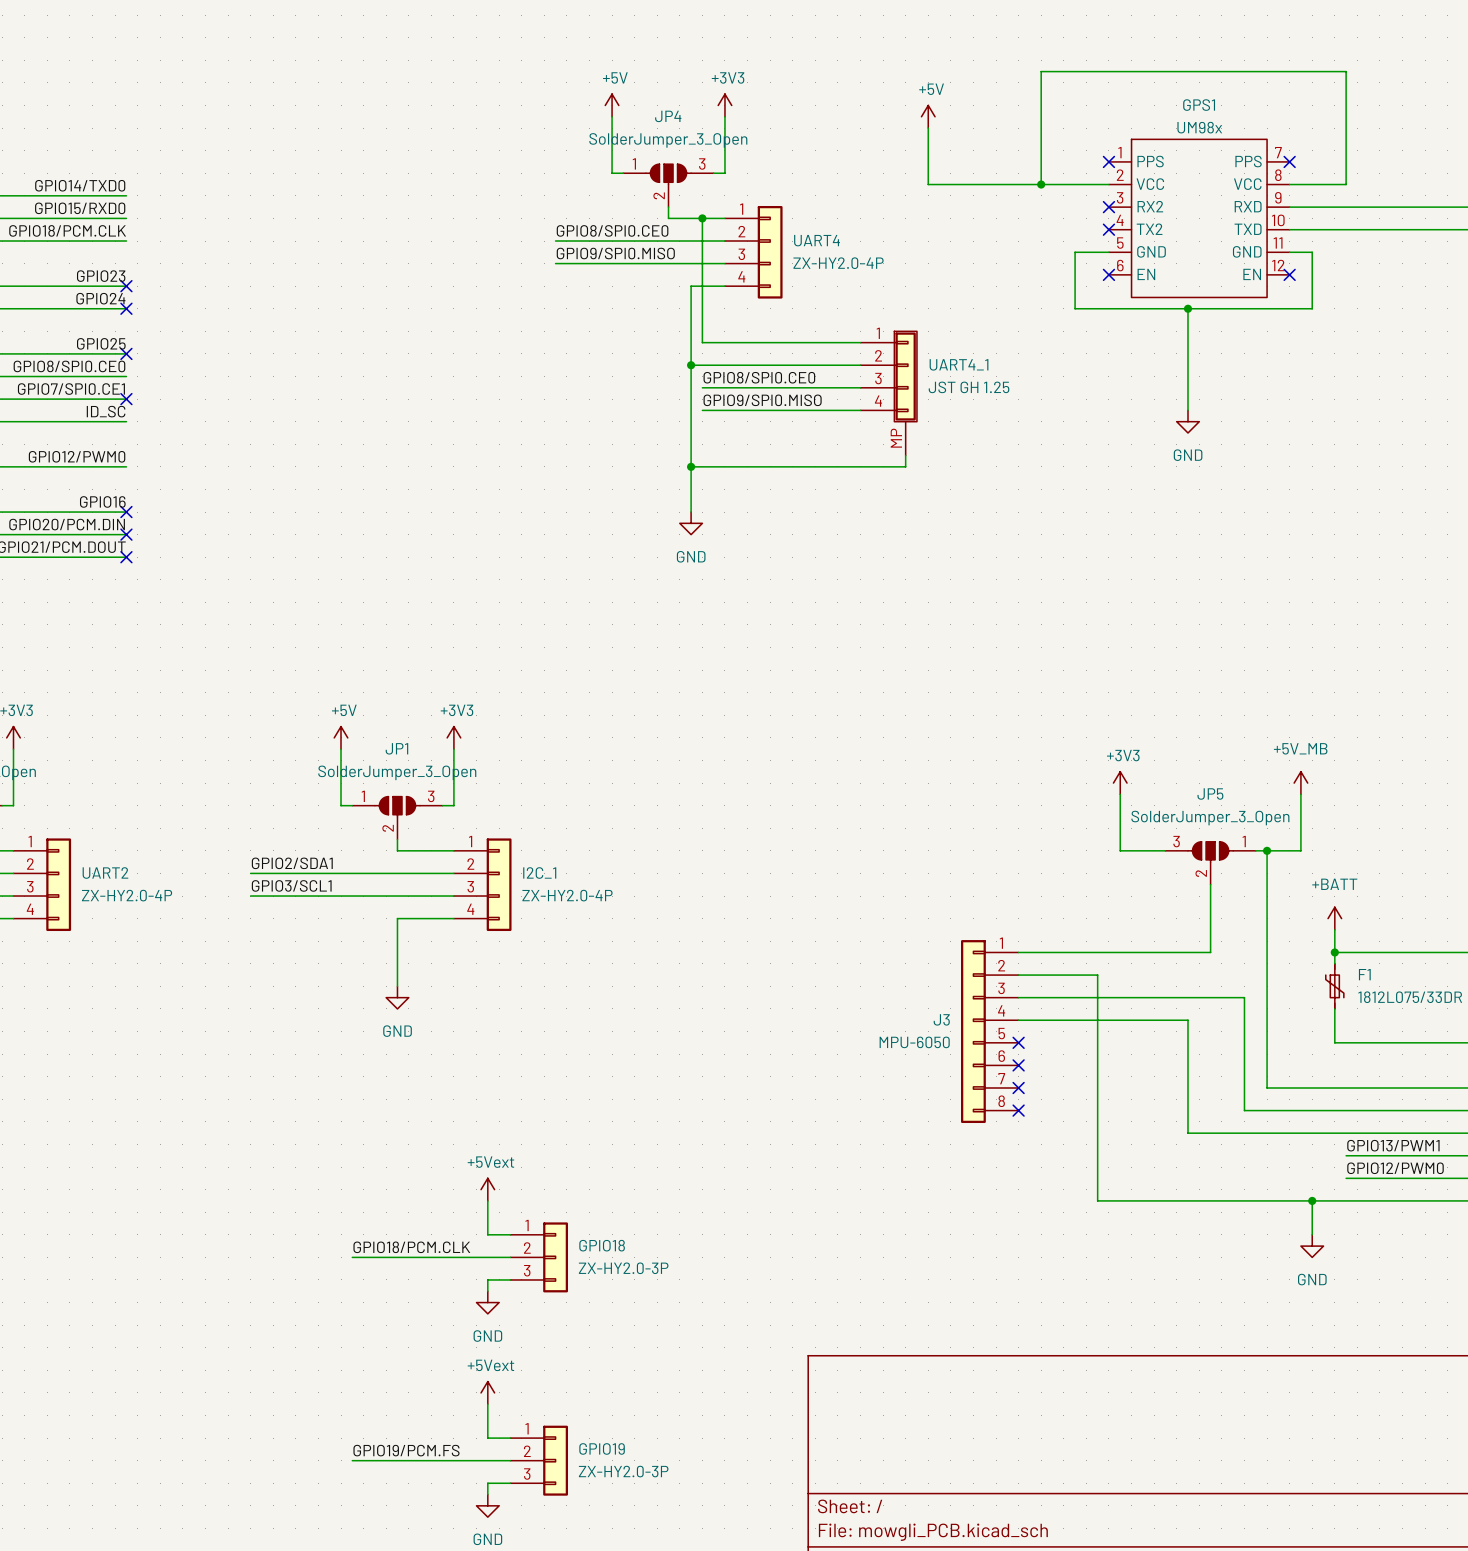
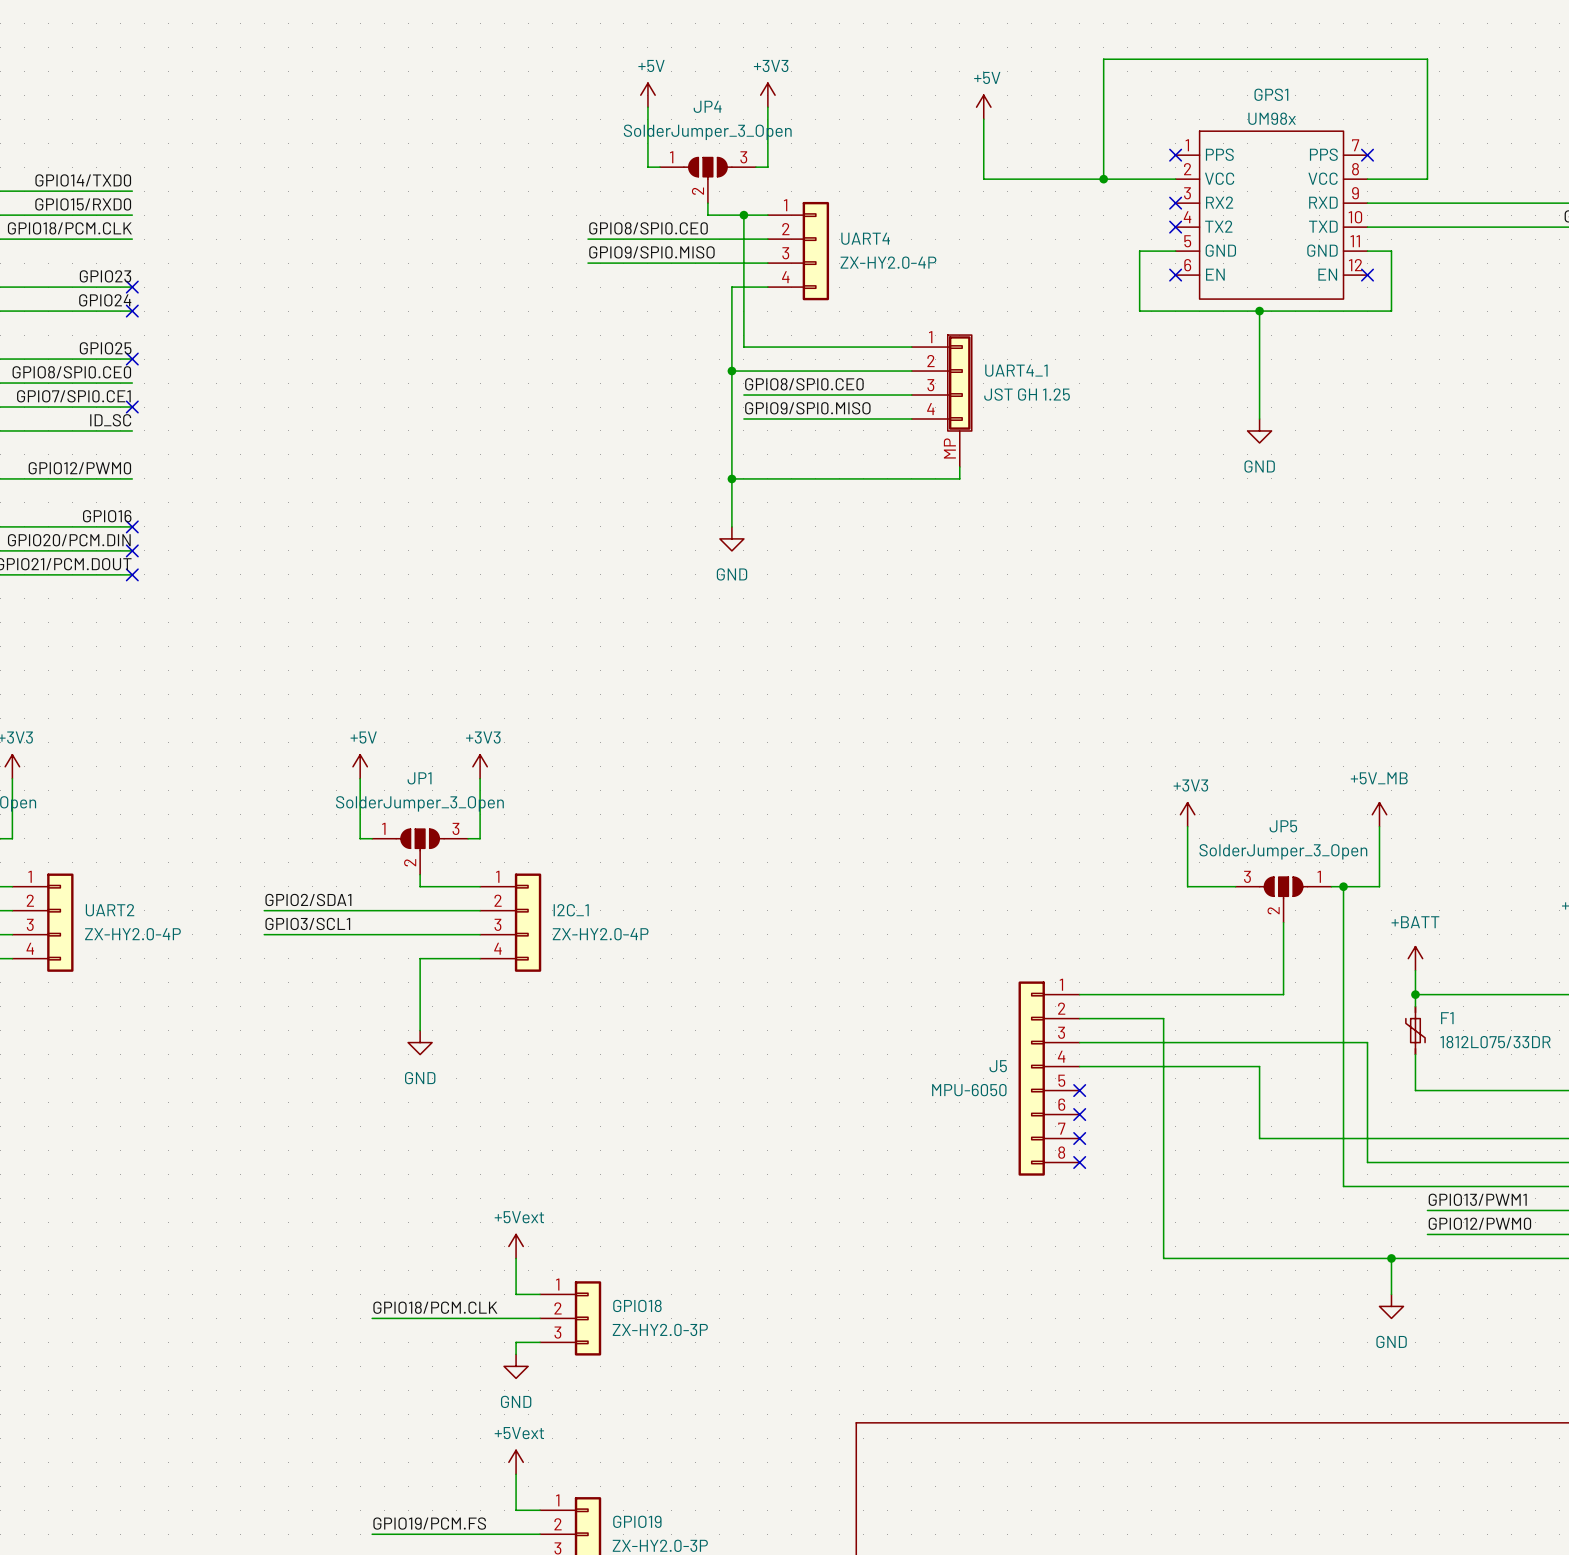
wire: (1244, 997) (1244, 1110) (1289, 1110) -> (1319, 1042) (1367, 1042) (1367, 1162)
J3 name: J3 (941, 1019) -> J5 (998, 1066)
wire: (1188, 1088) (1188, 1133) (1267, 1133) -> (1259, 1138) (1343, 1138) (1343, 1186)

